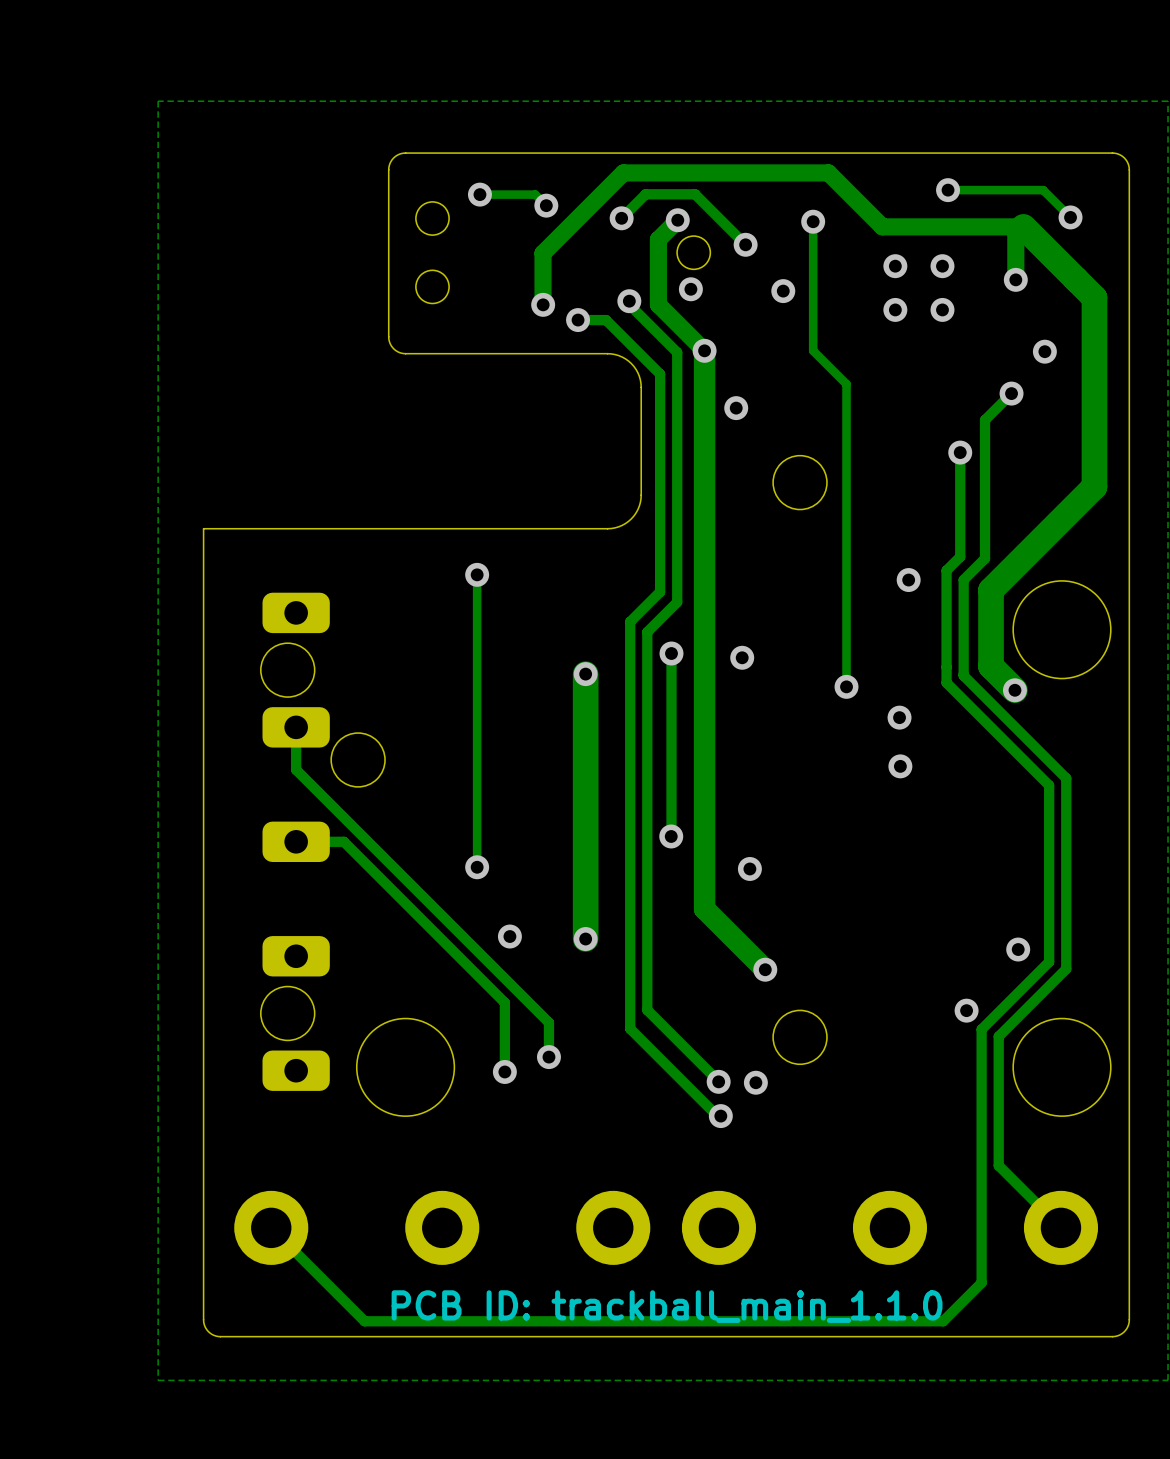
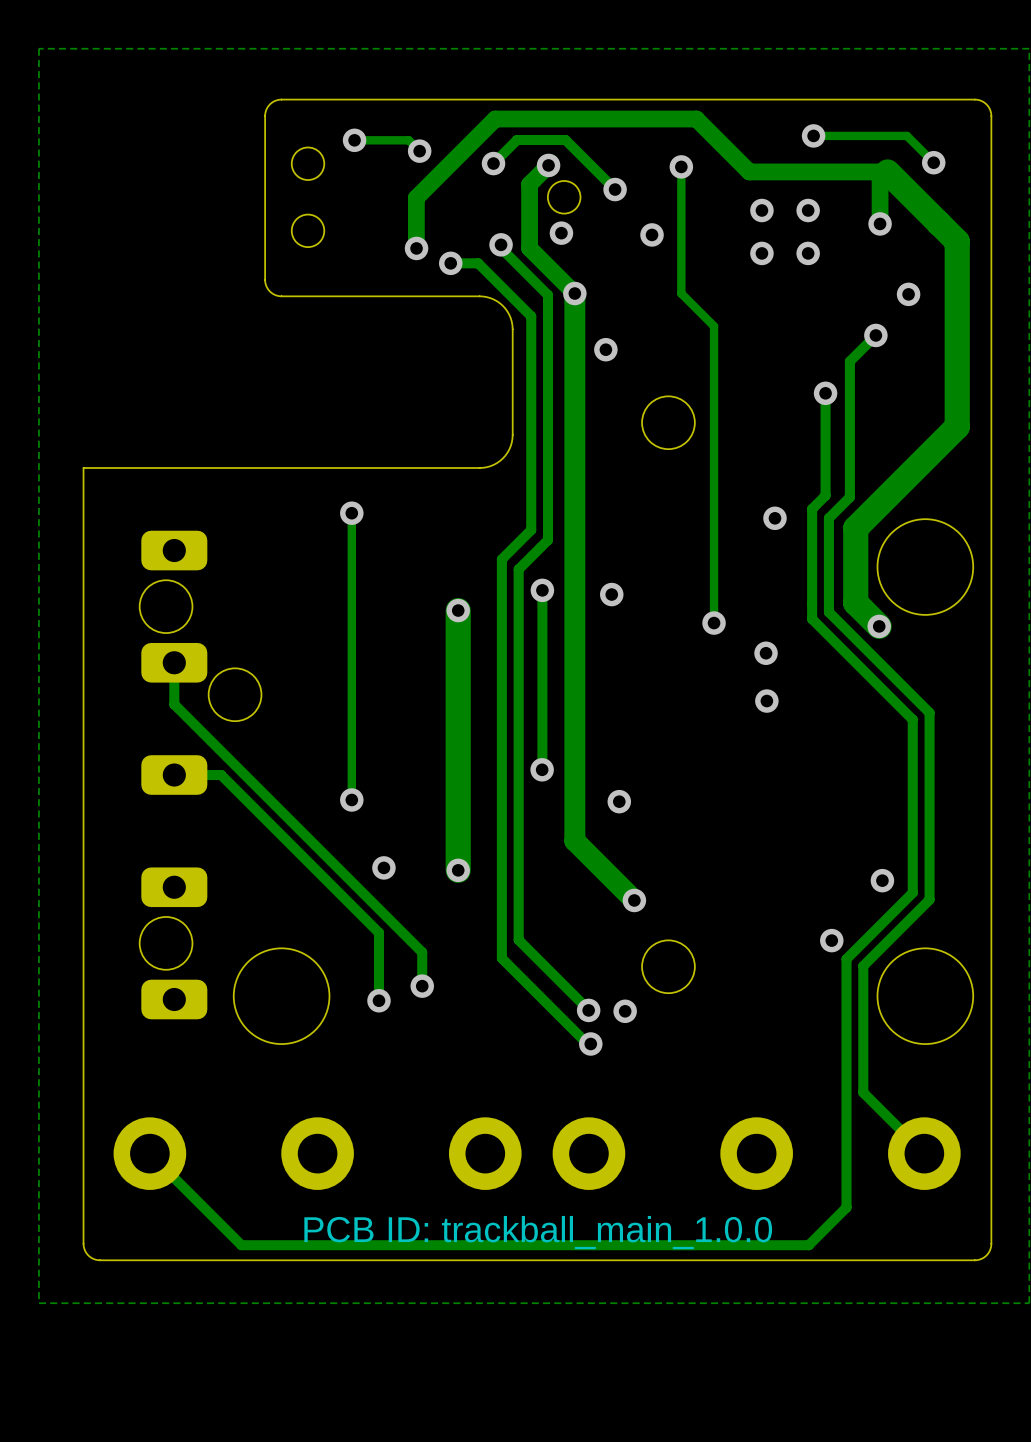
text: PCB ID: trackball_main_1.1.0 (667, 1306) -> PCB ID: trackball_main_1.0.0 (538, 1232)

